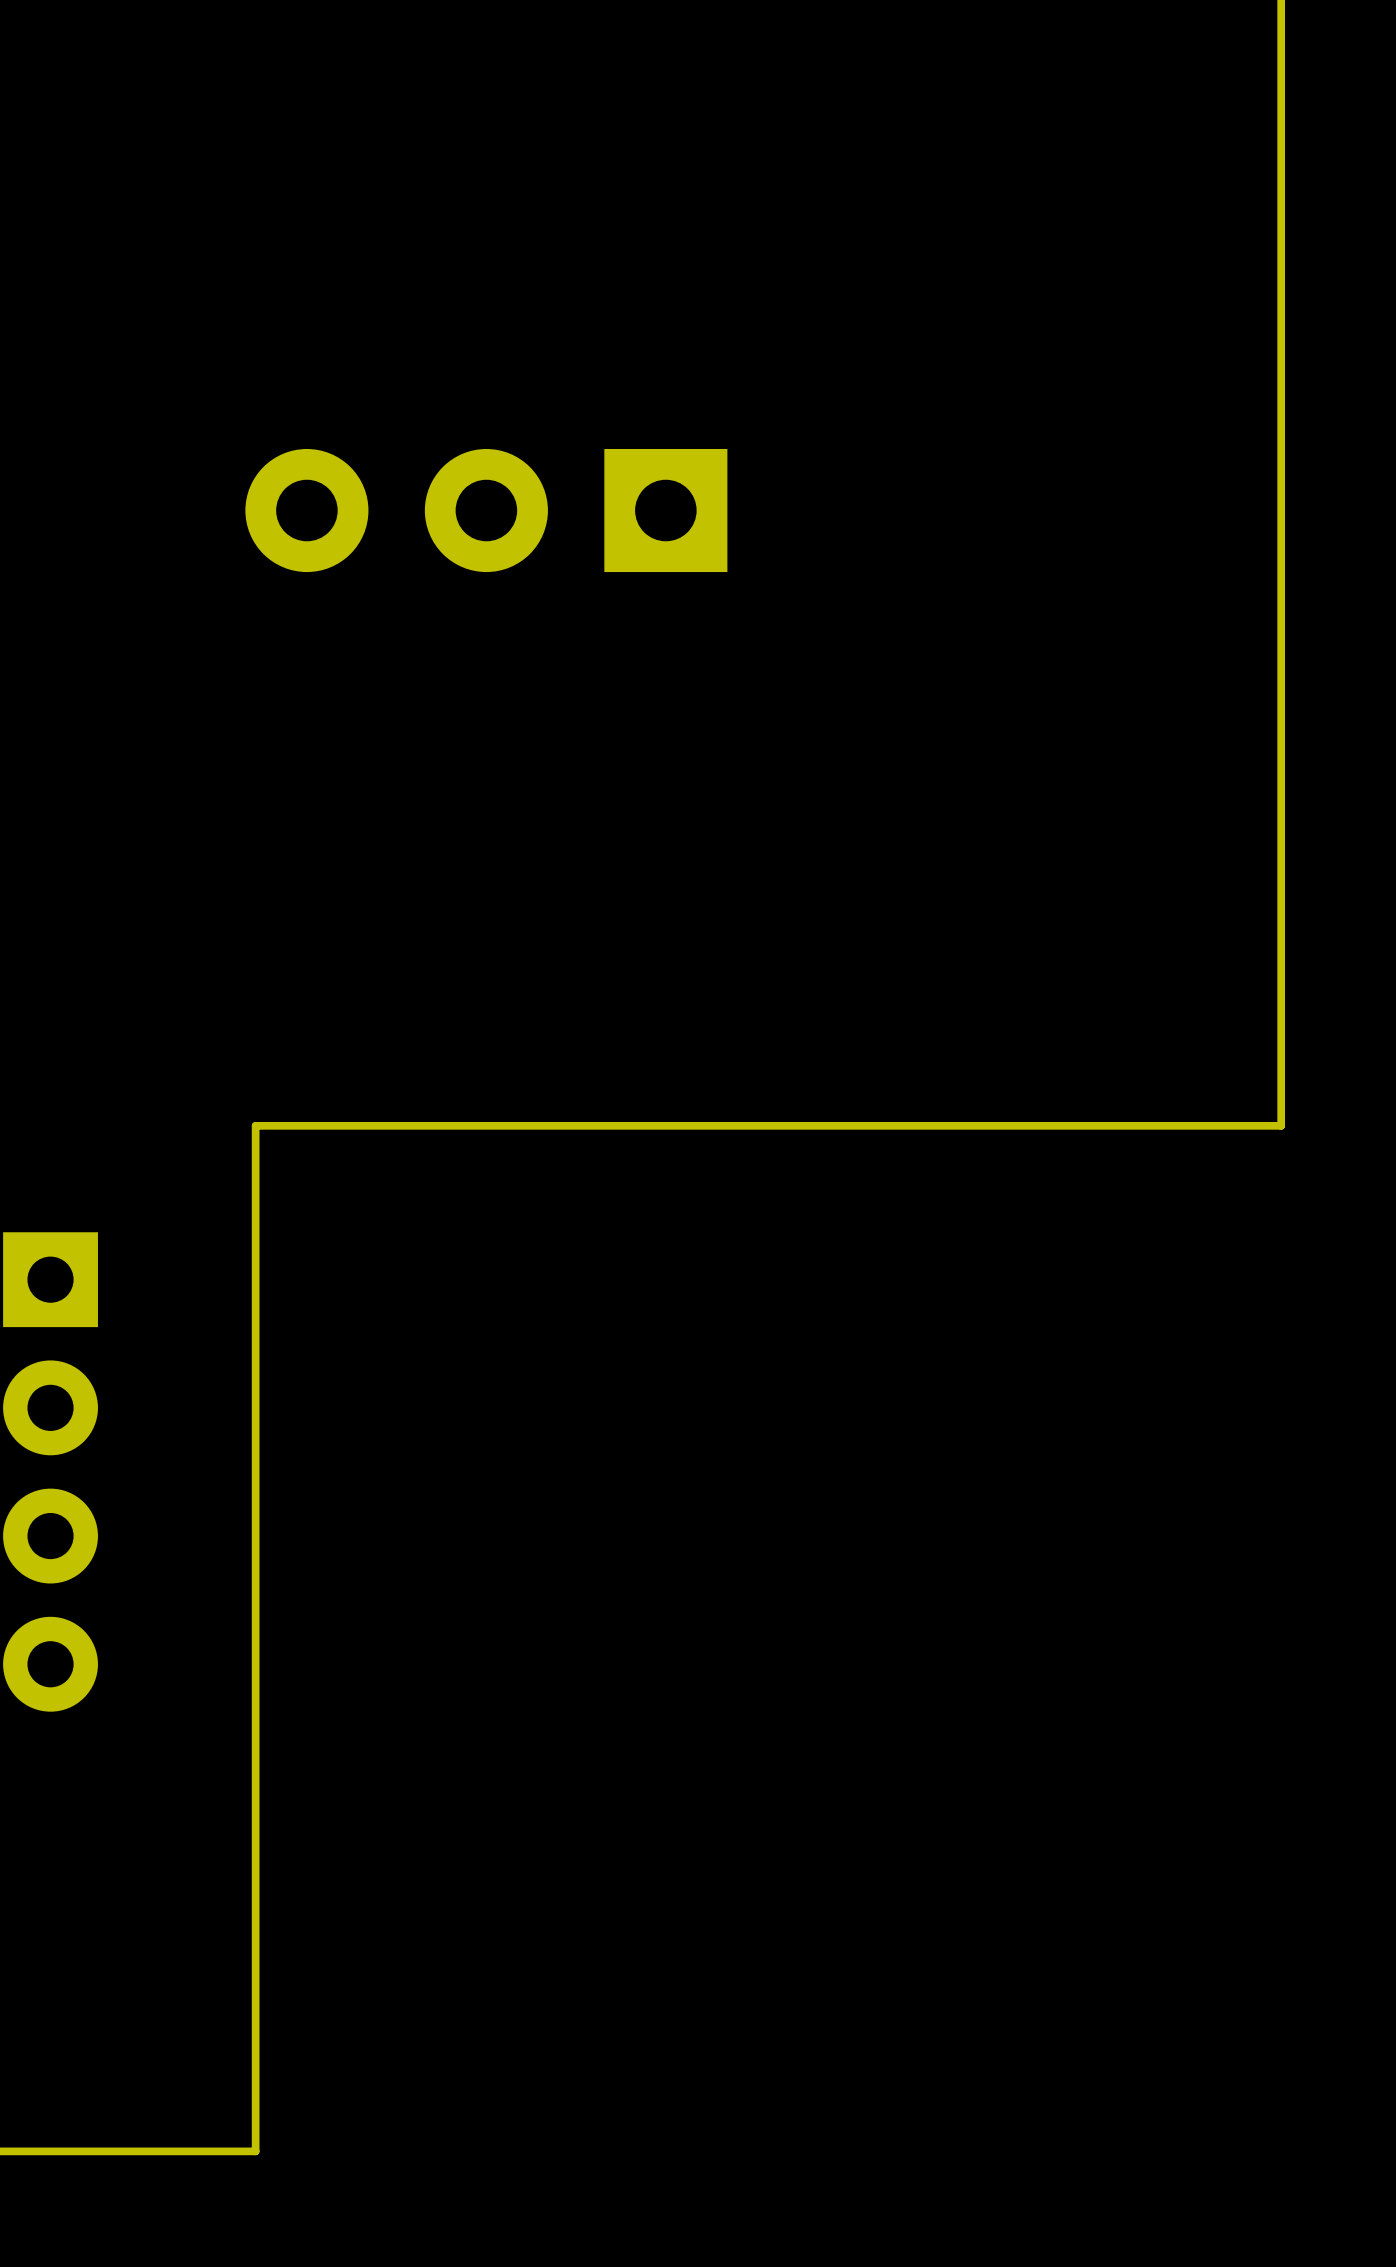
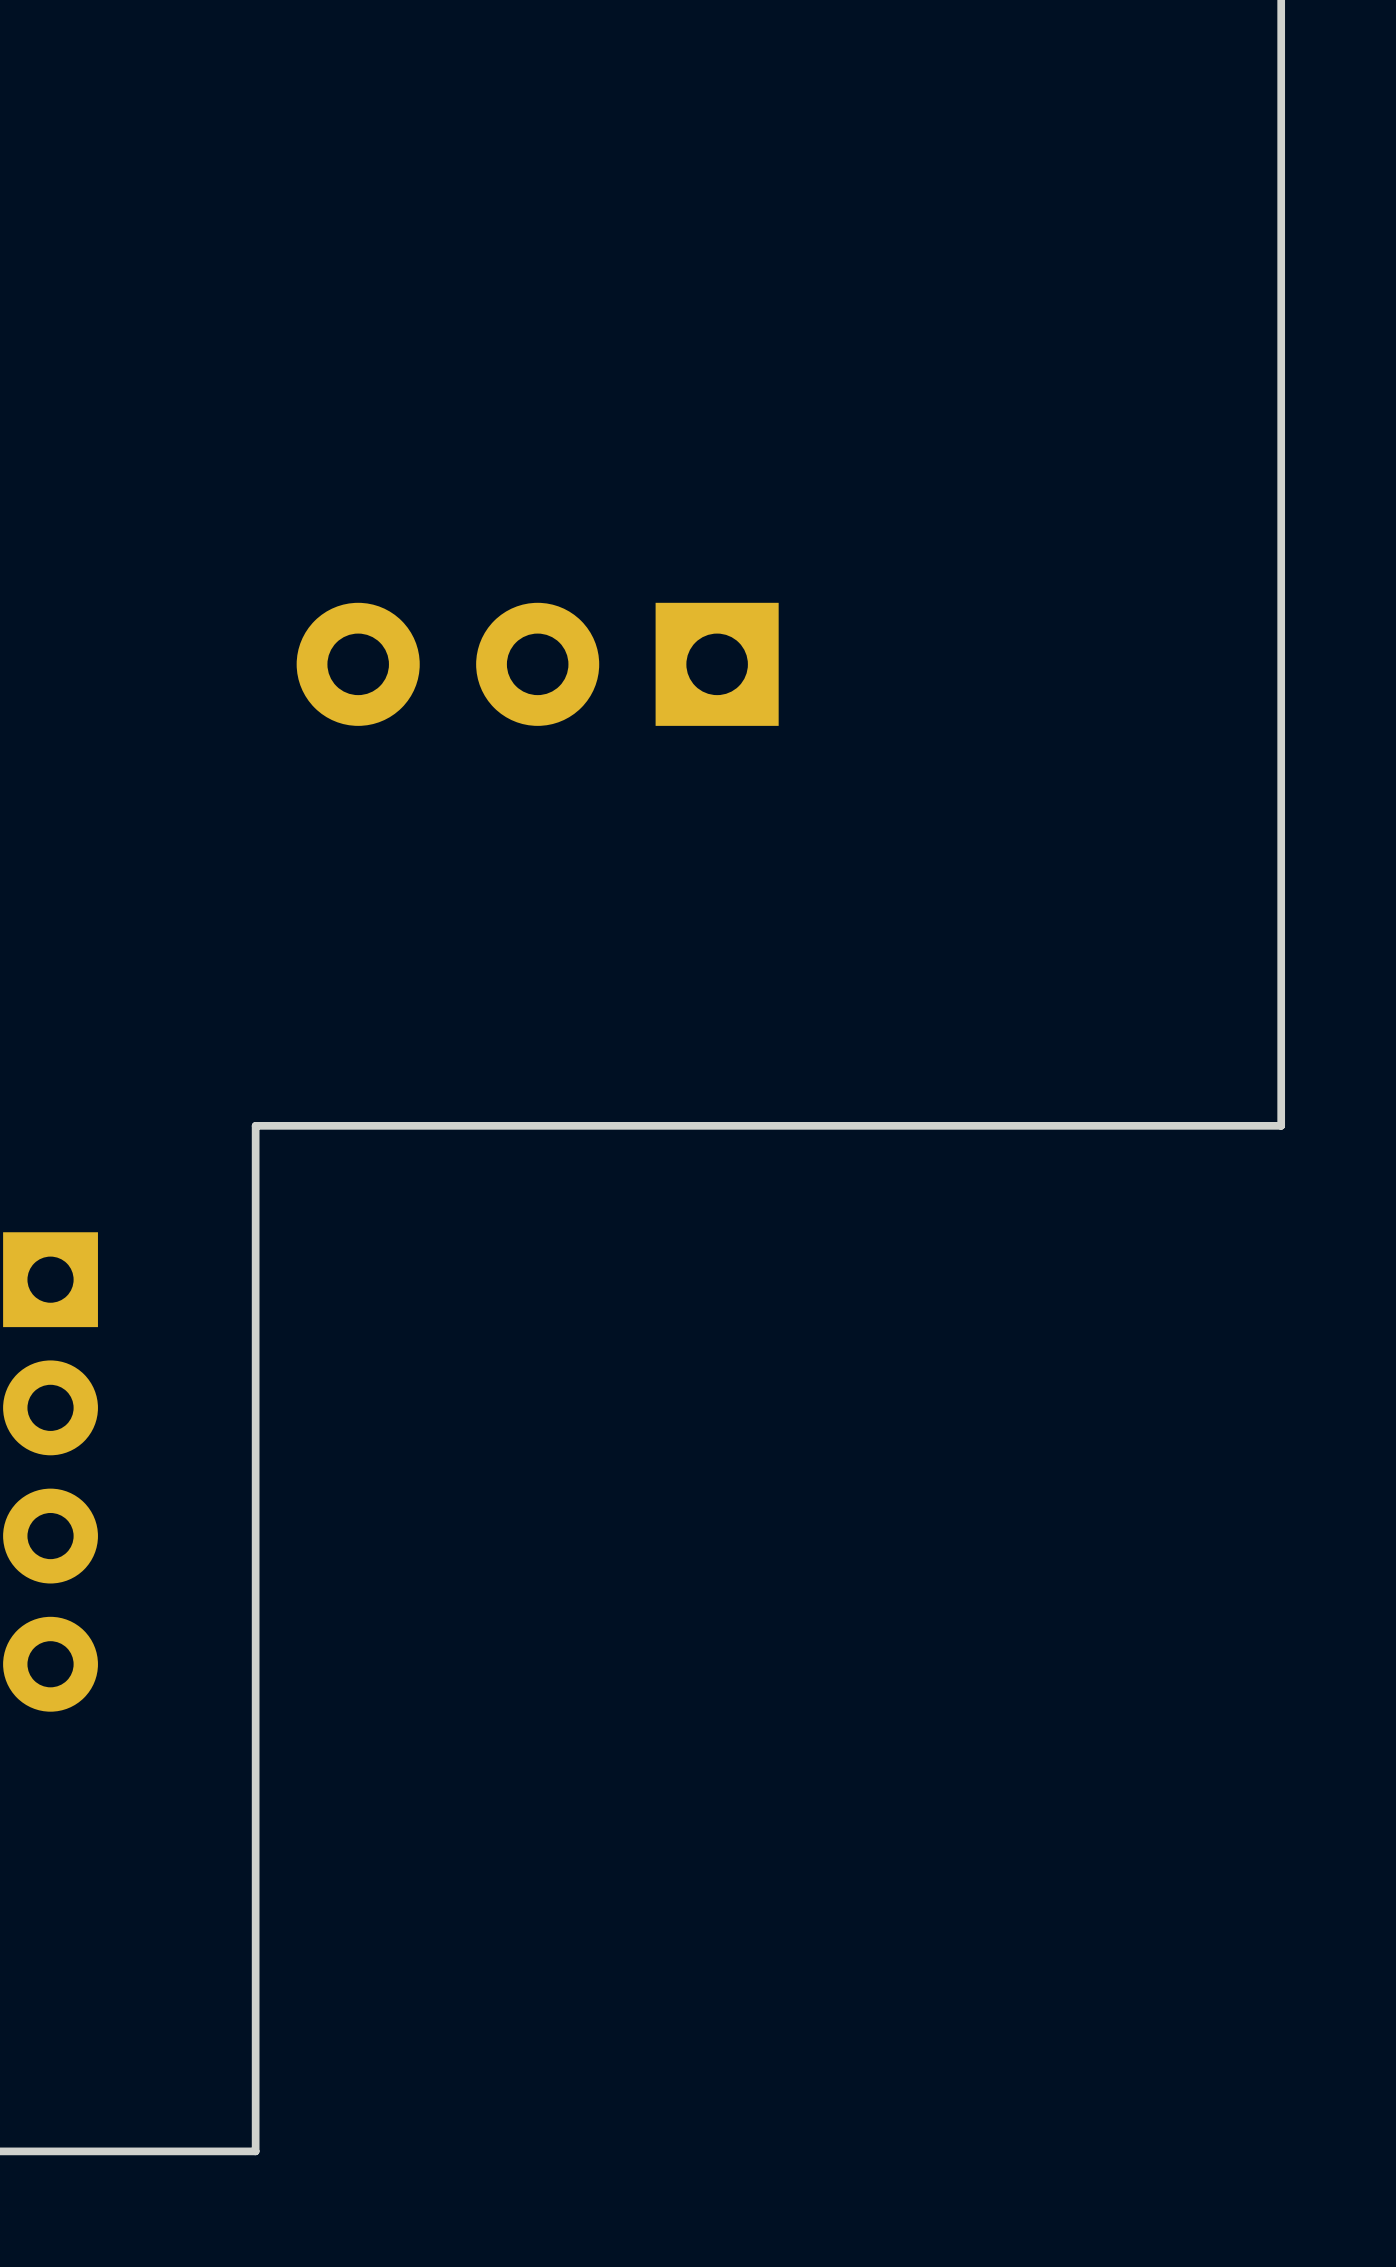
part position: (486, 510) -> (537, 664)

